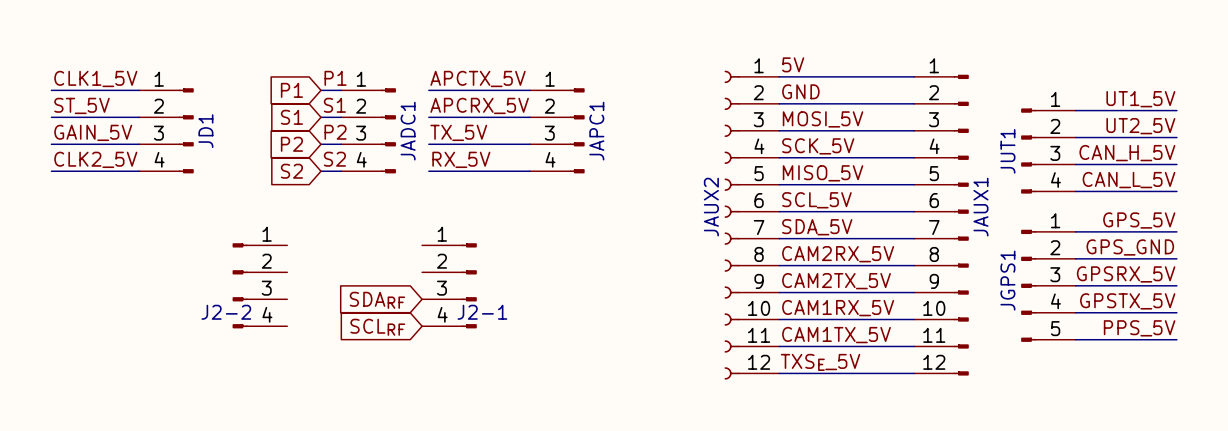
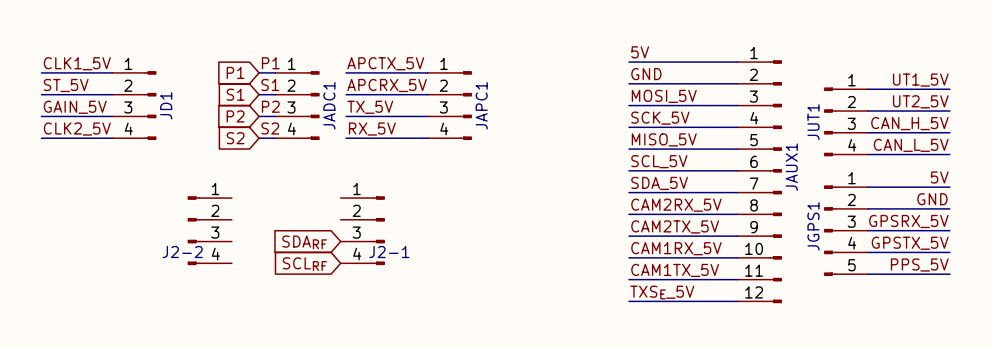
label: GPS_5V (1139, 220) -> 5V (939, 177)
JAUX2: (751, 225) -> none
label: GPS_GND (1130, 247) -> GND (932, 199)

